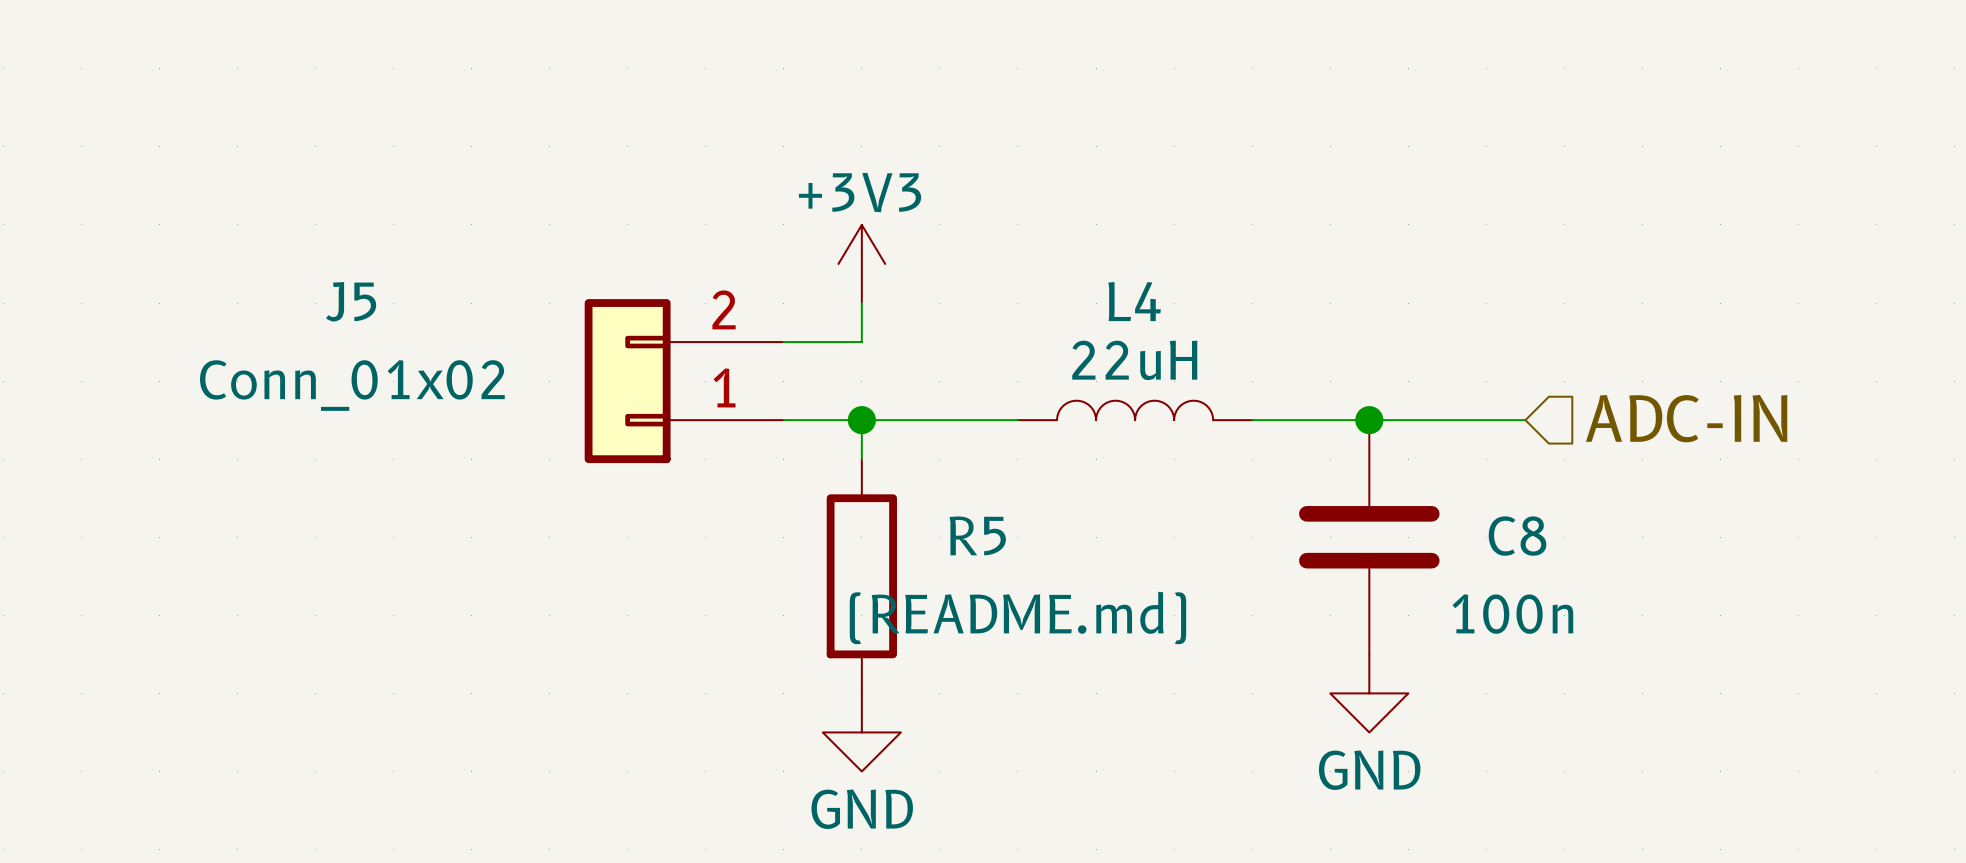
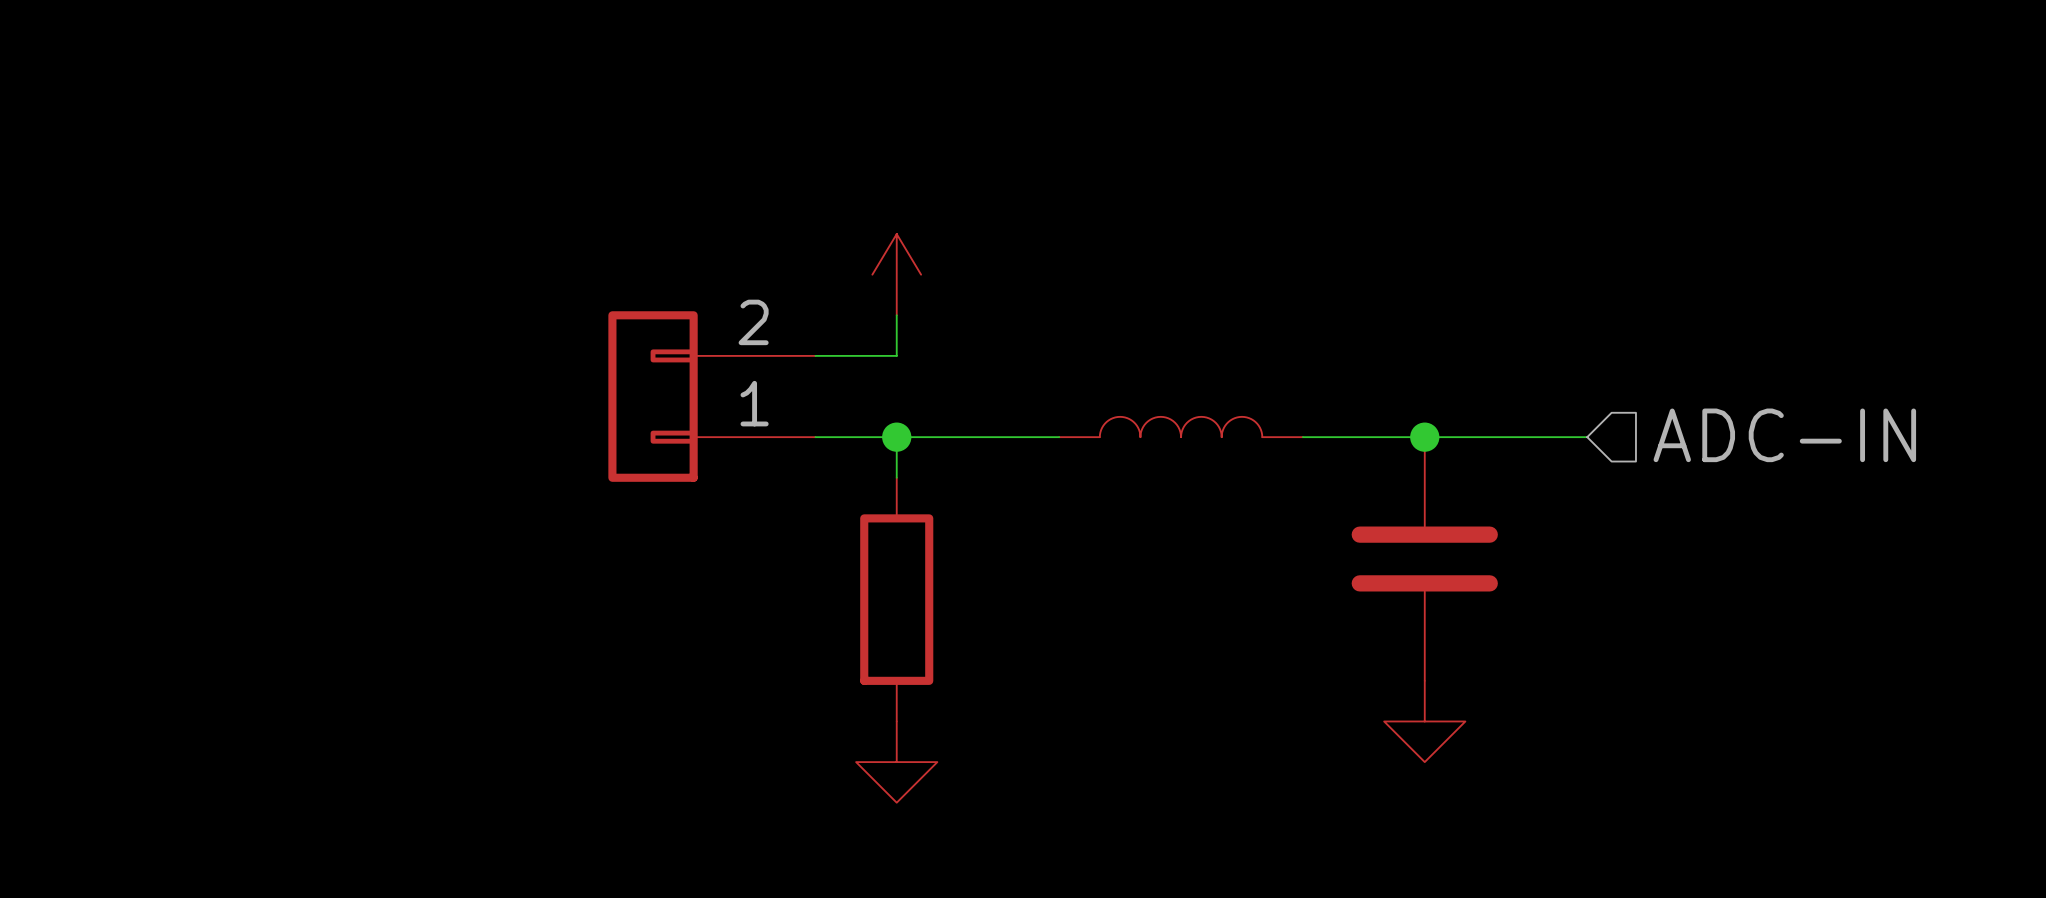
power symbol text: +3V3 (860, 192) -> none
J5 name: J5 (351, 301) -> none
J5 value: Conn_01x02 (352, 385) -> none
L4: 22uH (1135, 410) -> none
R5 name: R5 (977, 535) -> none
C8 name: C8 (1517, 536) -> none
C8 value: 100n (1512, 614) -> none
R5 value: (README.md) (1017, 617) -> none
power symbol text: GND (1369, 770) -> none
power symbol text: GND (862, 809) -> none

